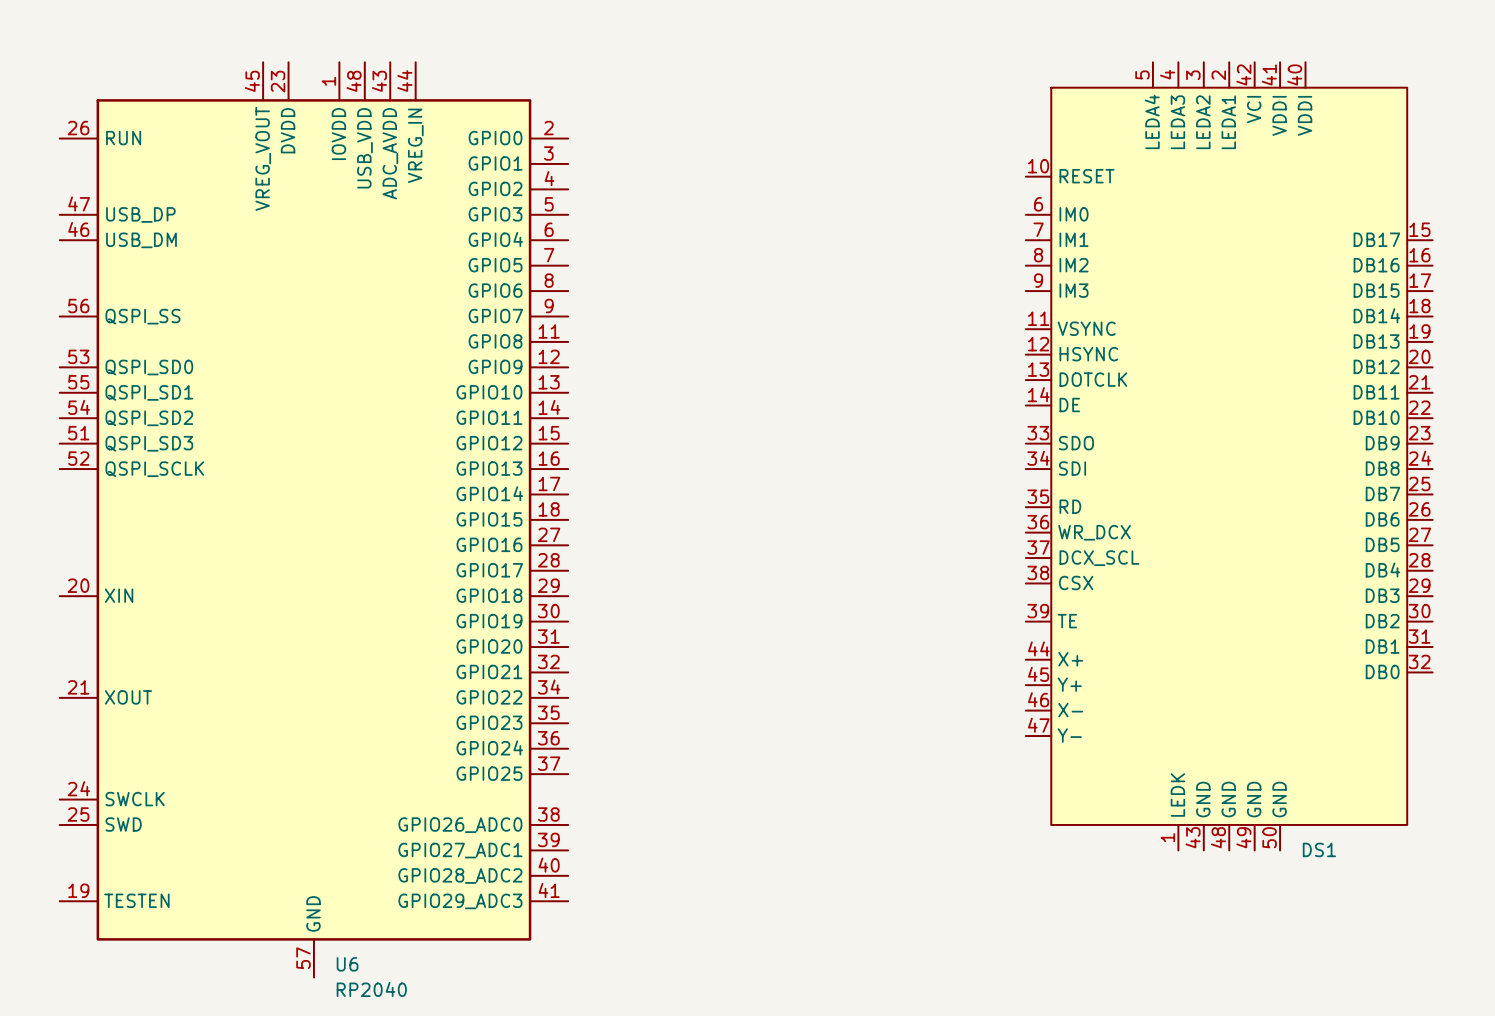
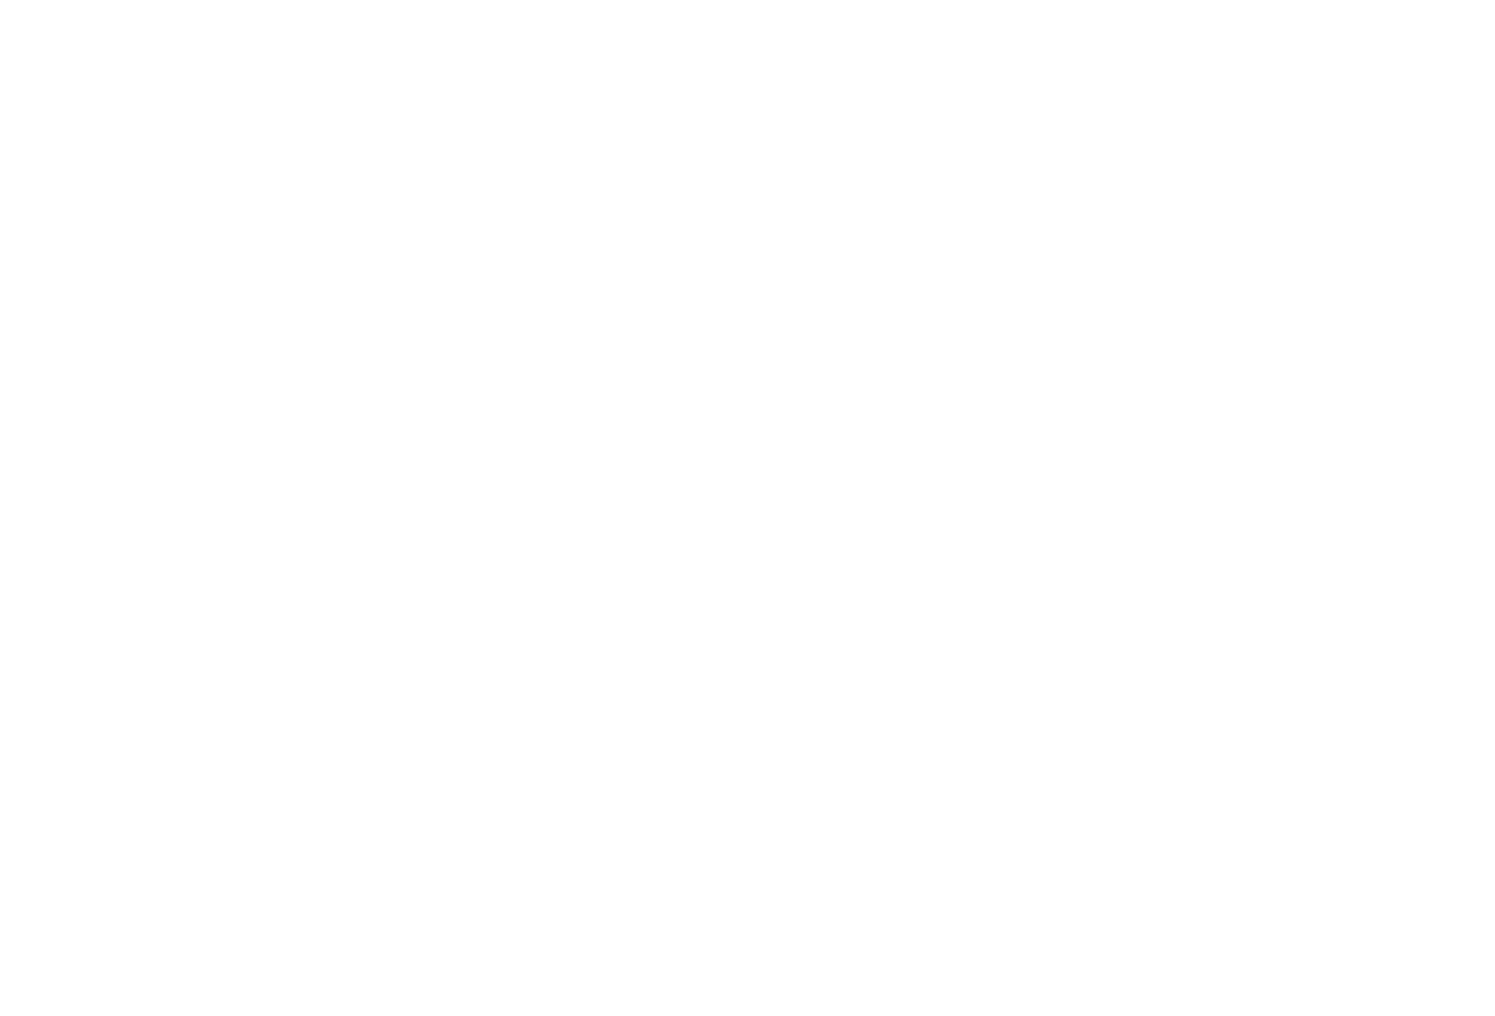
DS1: (1229, 456) -> none
U6: RP2040 (313, 519) -> none

